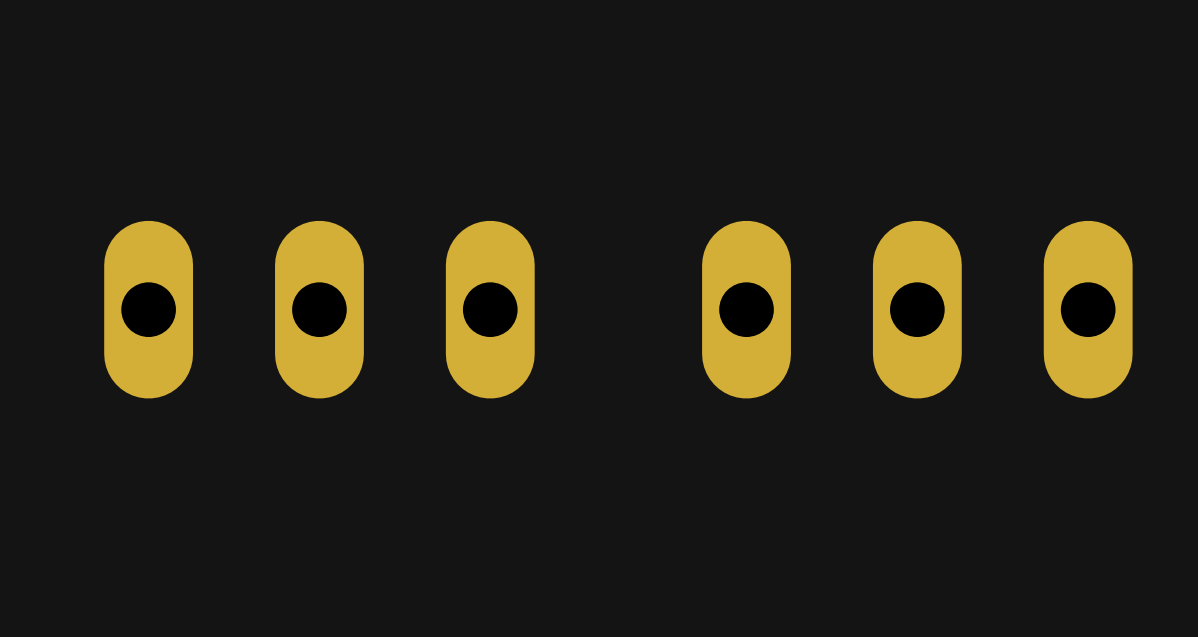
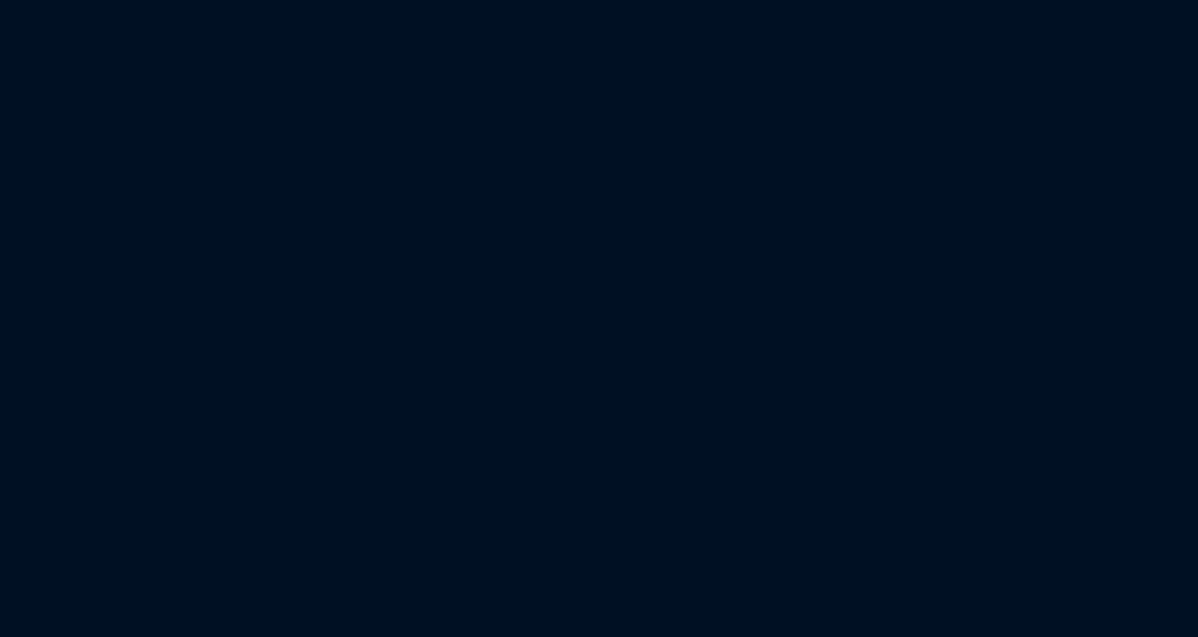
part: (319, 309) -> none
part: (917, 309) -> none

